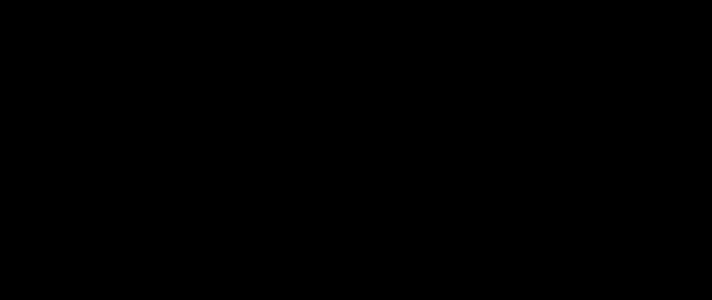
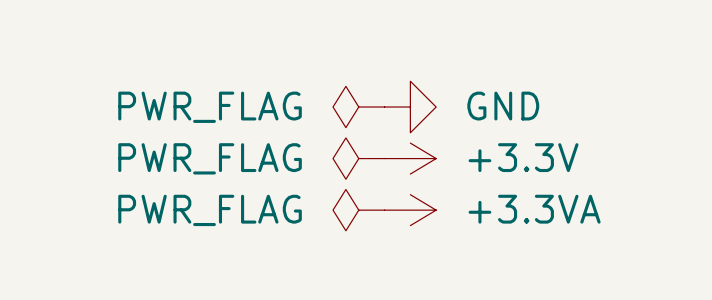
power symbol: none -> PWR_FLAG (358, 107)
power symbol: none -> GND (410, 107)
power symbol: none -> PWR_FLAG (358, 158)
power symbol: none -> +3.3V (410, 158)
power symbol: none -> PWR_FLAG (358, 210)
power symbol: none -> +3.3VA (410, 210)

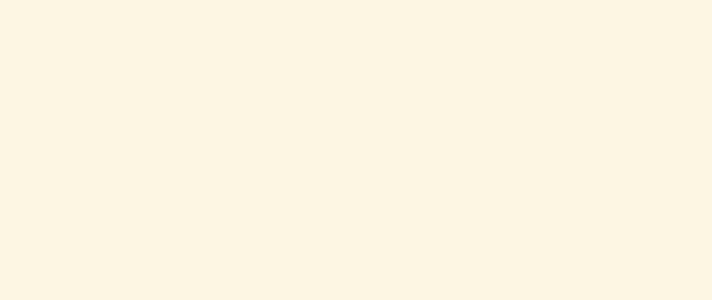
power symbol: PWR_FLAG (358, 107) -> none
power symbol: GND (410, 107) -> none
power symbol: PWR_FLAG (358, 158) -> none
power symbol: +3.3V (410, 158) -> none
power symbol: PWR_FLAG (358, 210) -> none
power symbol: +3.3VA (410, 210) -> none

